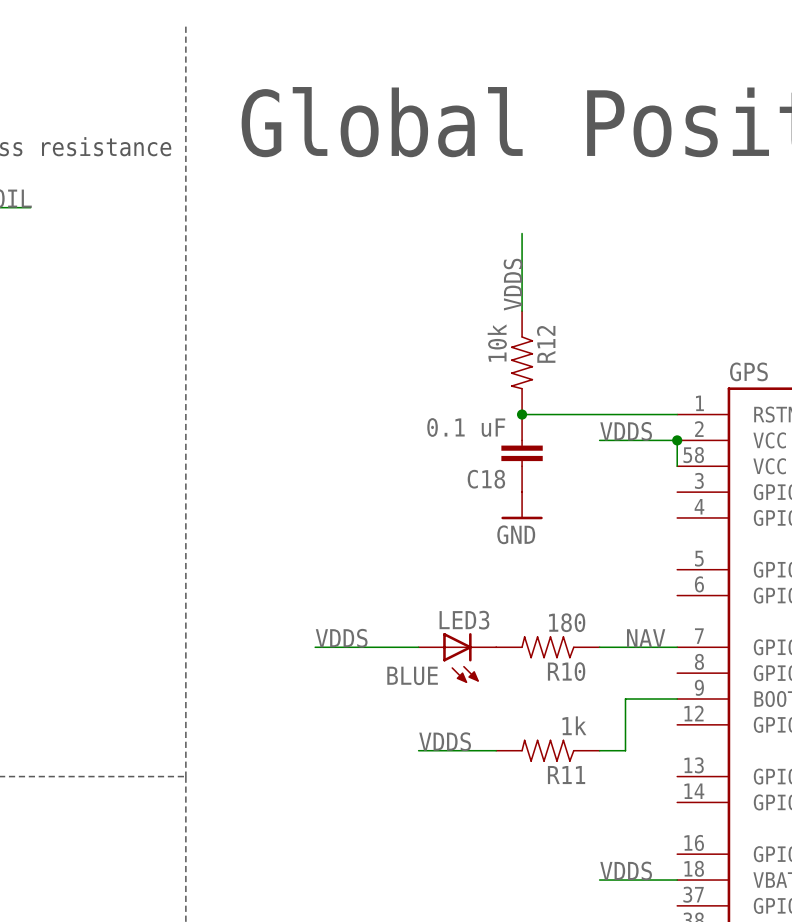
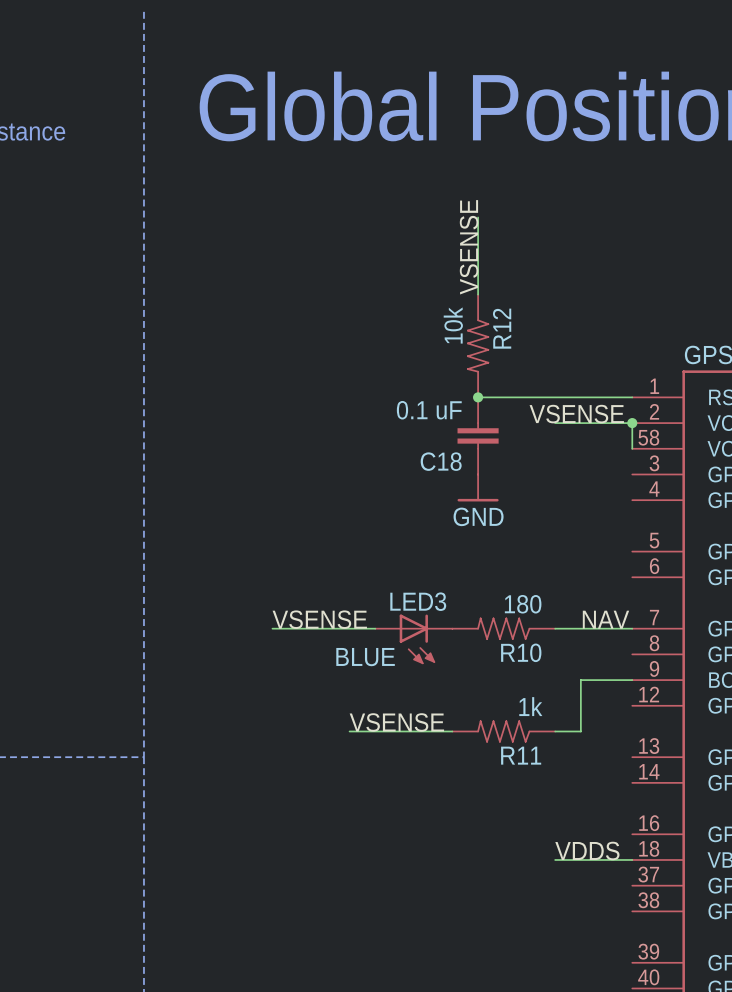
label: VDDS (513, 284) -> VSENSE (469, 247)
label: none -> VSENSE (576, 414)
label: VDDS (626, 431) -> none
label: VDDS (341, 638) -> VSENSE (319, 619)
label: none -> VSENSE (396, 722)
label: VDDS (445, 741) -> none
wire: none -> (349, 731) (375, 731)

